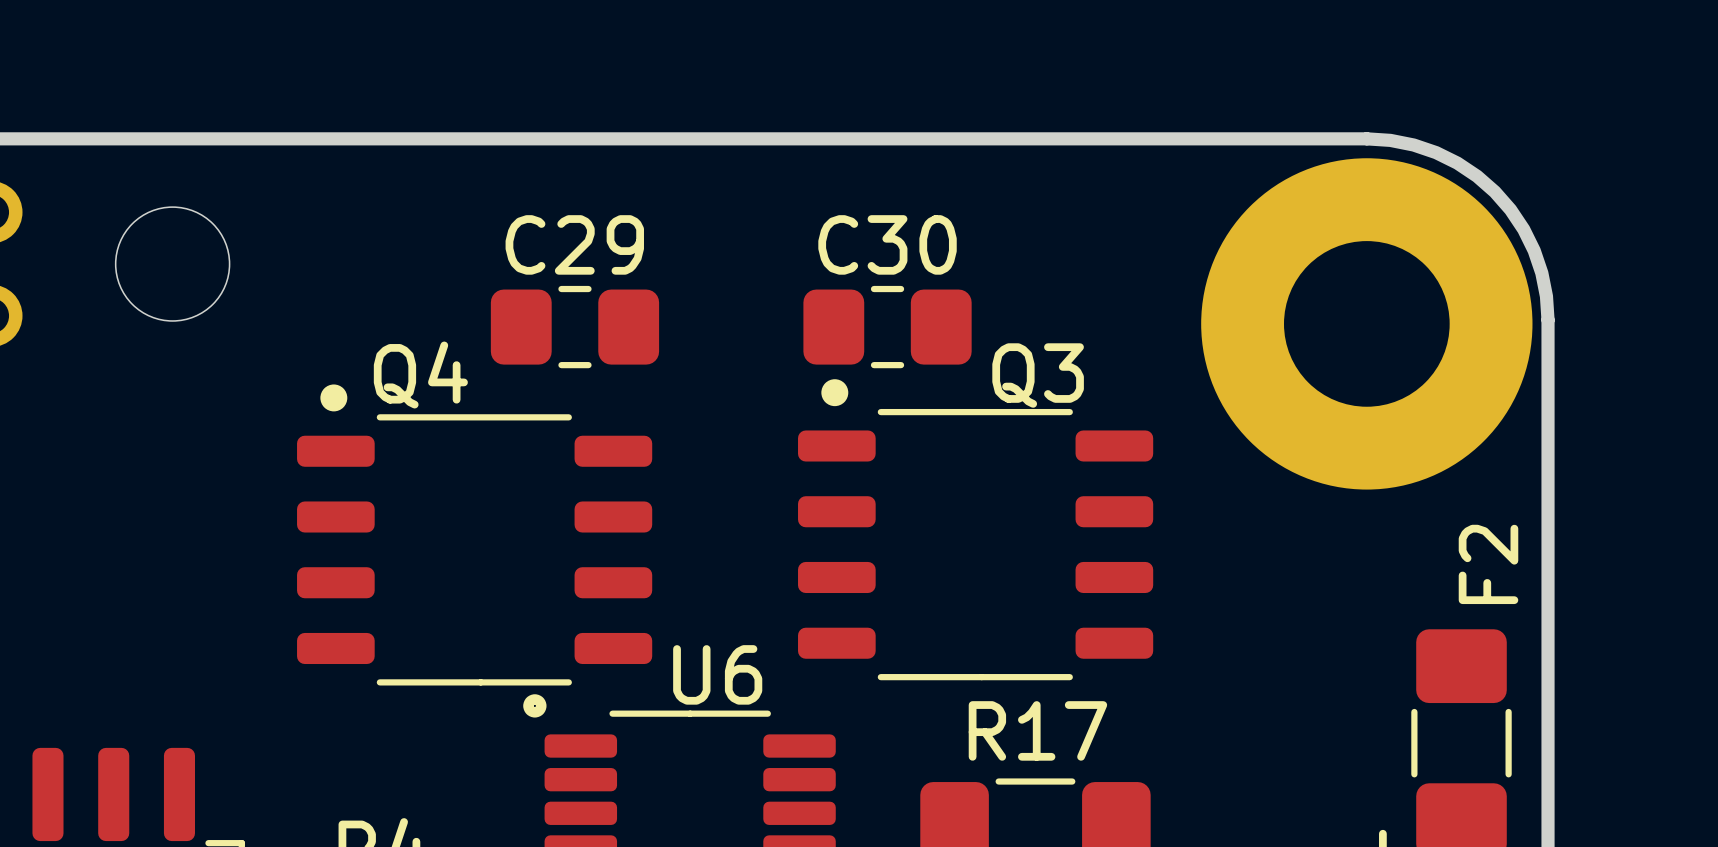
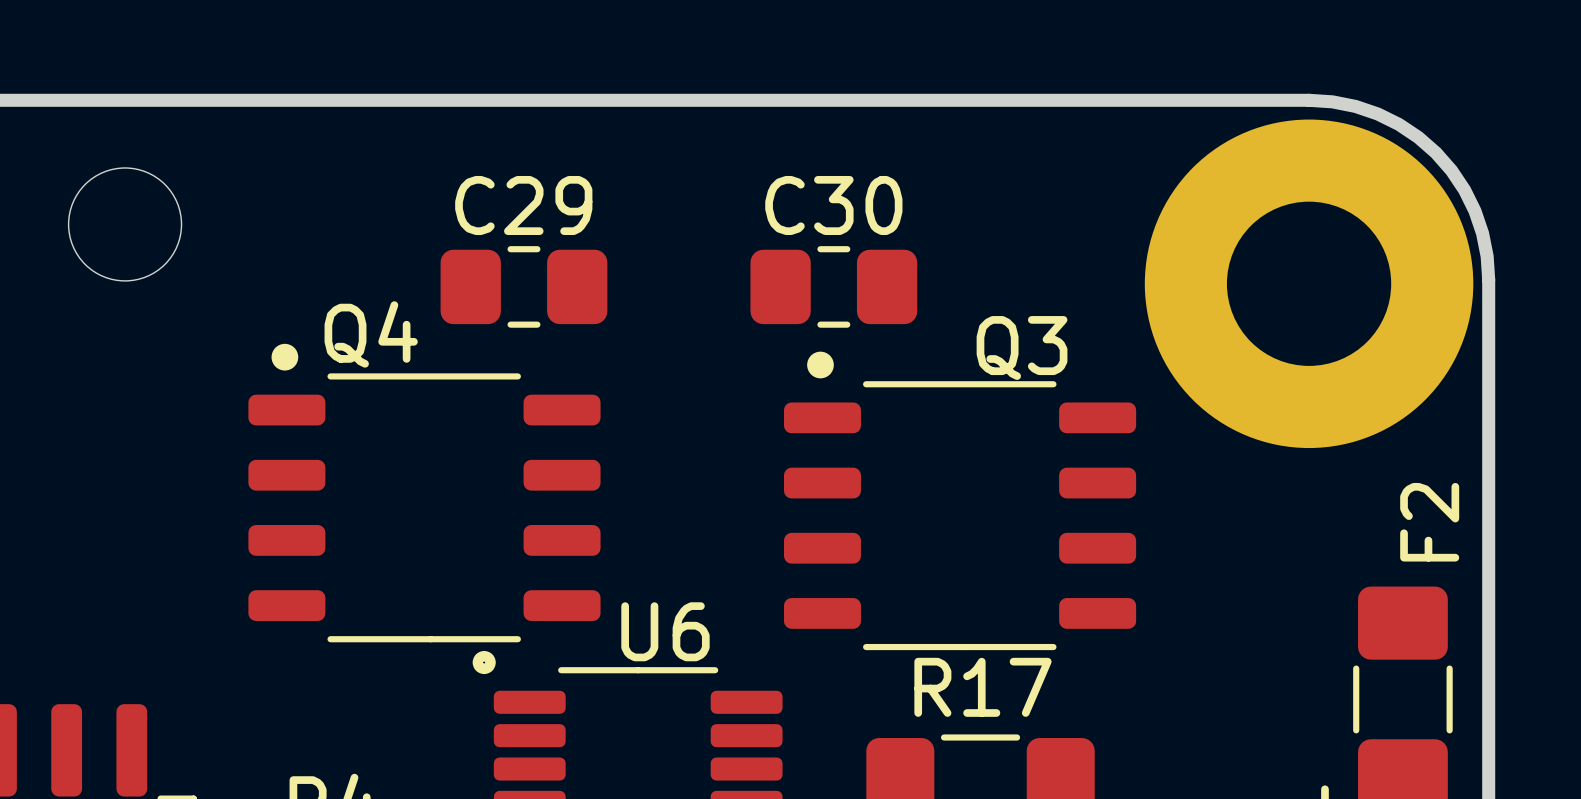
Q3 position: (975, 529) -> (960, 500)

